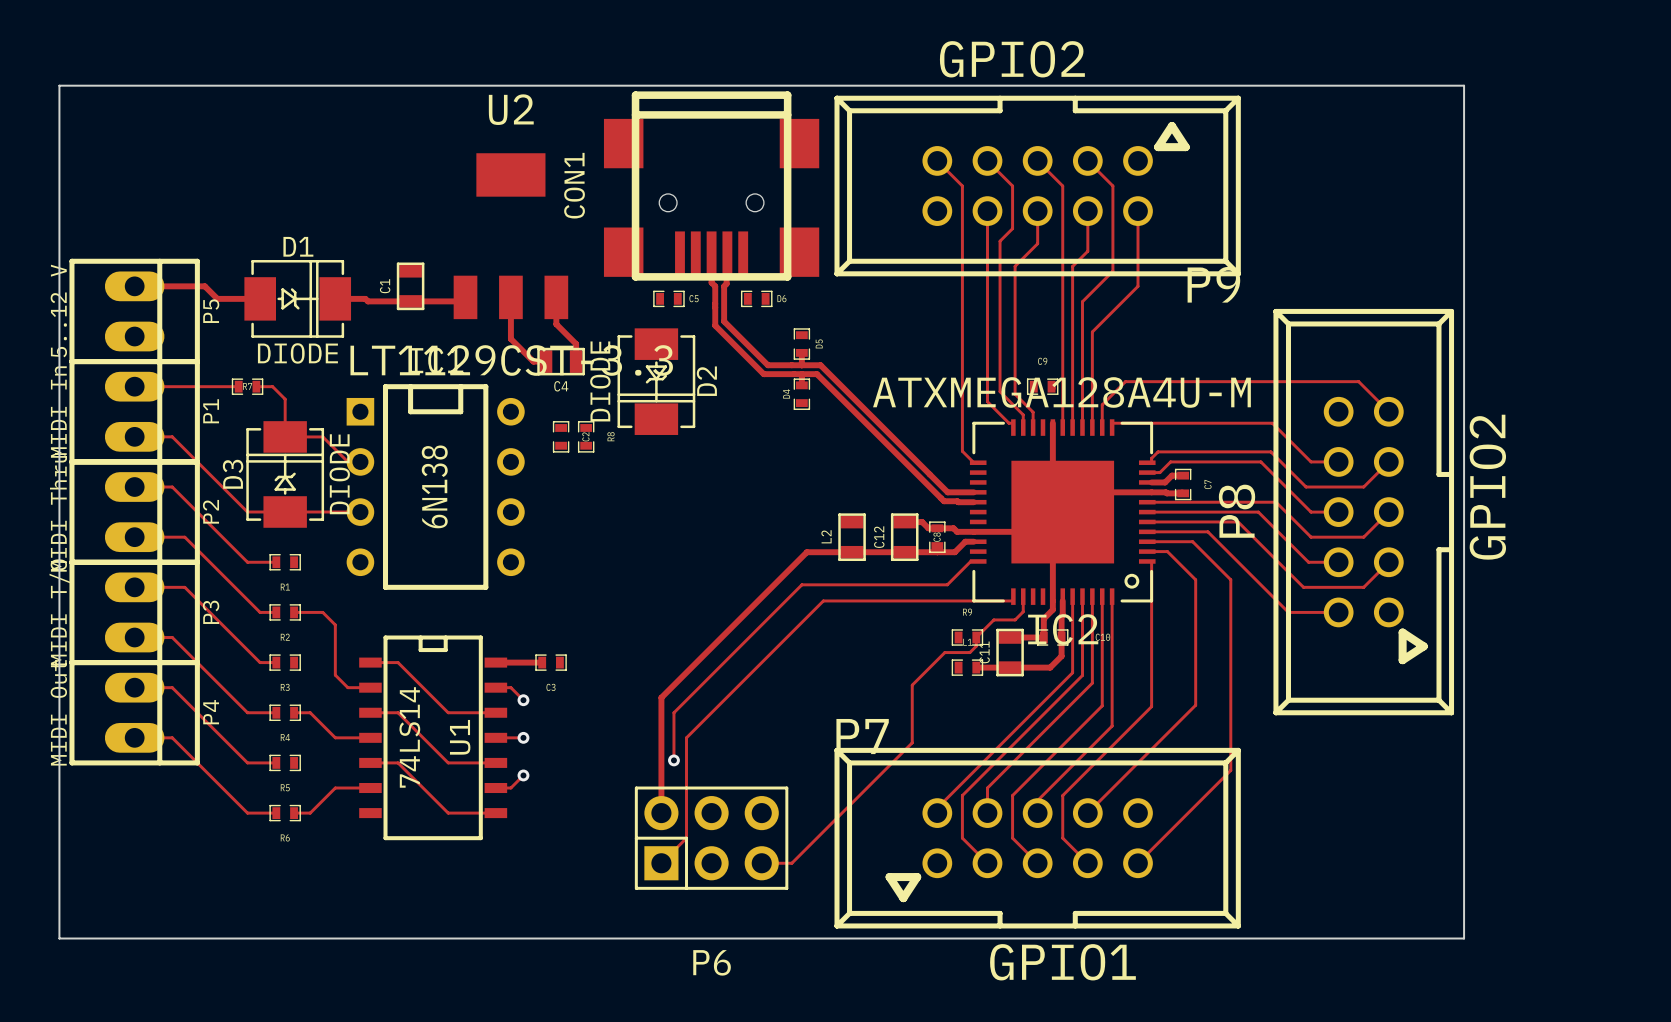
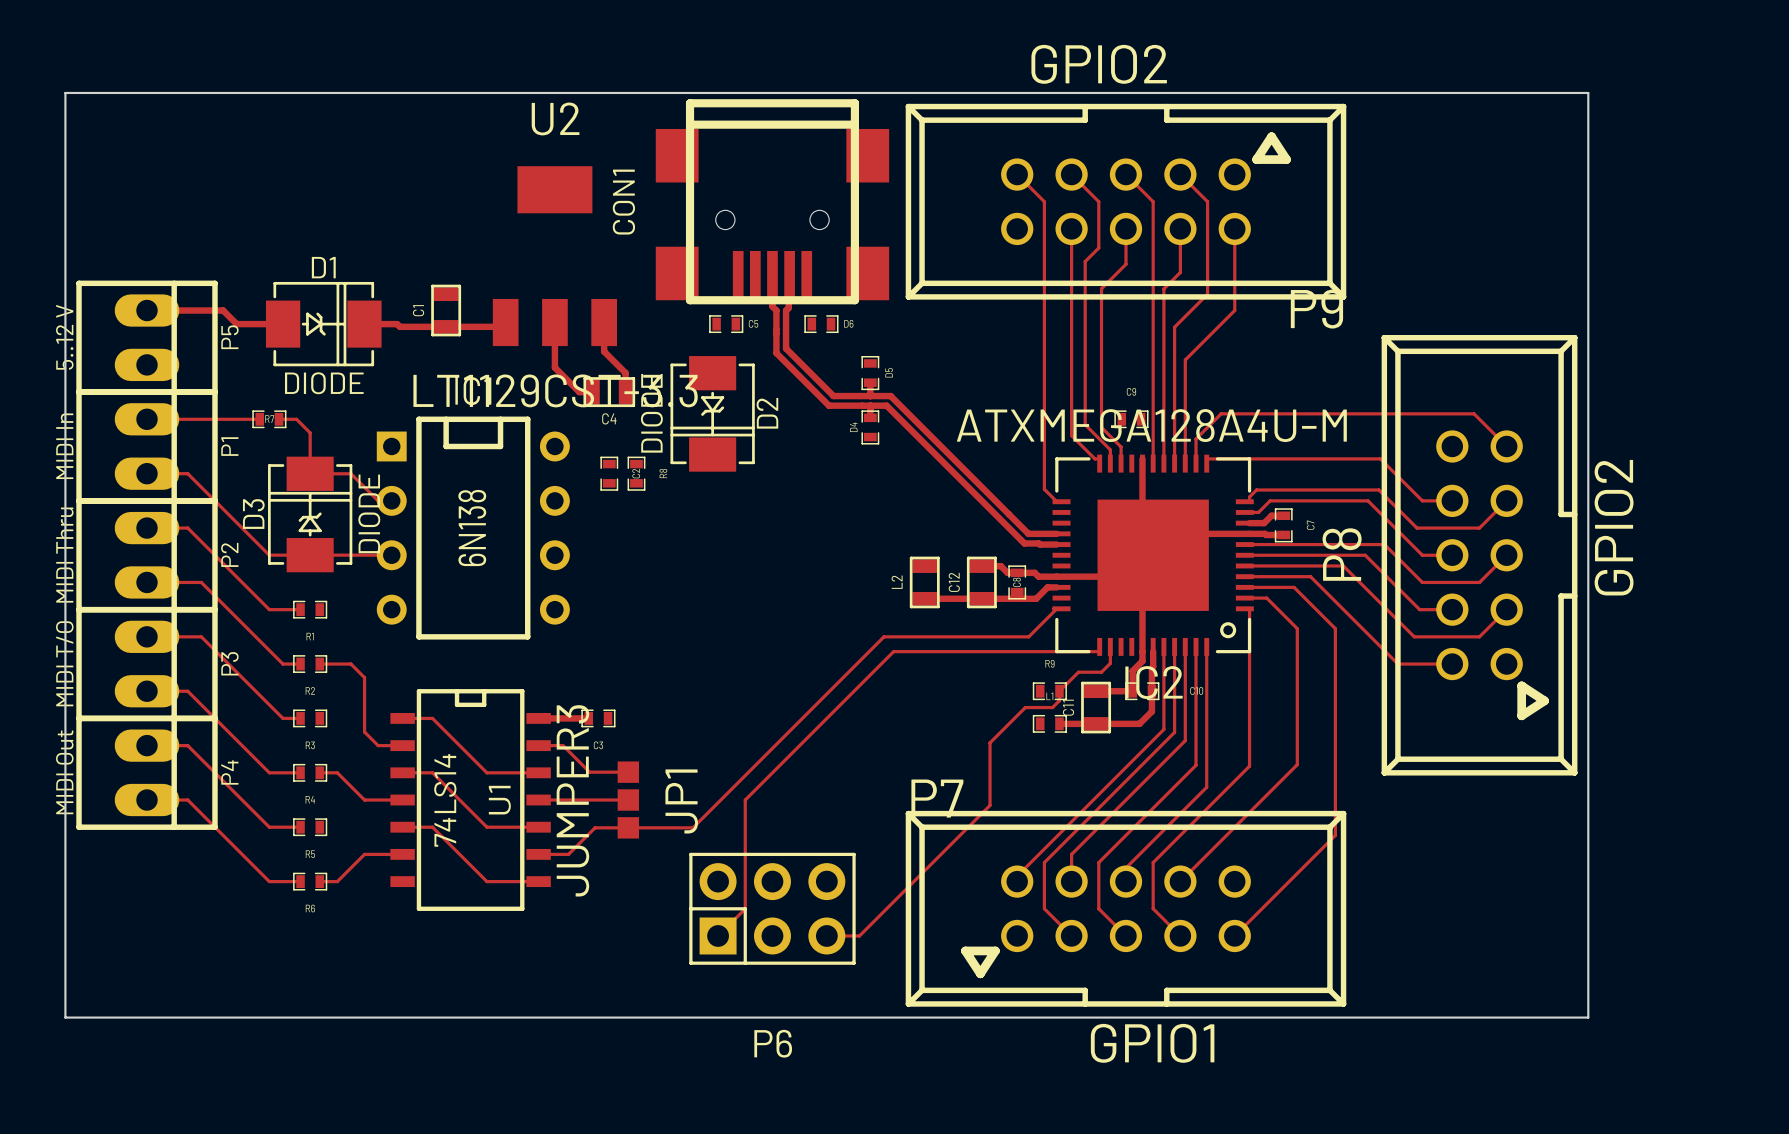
track: (852, 552) (806, 552) (661, 697) (661, 813) -> none
track: (970, 561) (947, 584) (801, 584) (673, 712) (673, 760) -> none
track: (510, 687) (523, 700) -> (554, 745) (563, 745) (589, 772) (628, 772)
via: (523, 700) -> none
track: none -> (568, 800) (628, 800)
via: (523, 737) -> none
JP1: none -> JUMPER3 (628, 800)
via: (673, 760) -> none
track: (523, 775) (510, 788) -> (1056, 608) (1028, 636) (883, 636) (692, 827) (595, 827) (568, 854) (554, 854)
via: (523, 775) -> none

